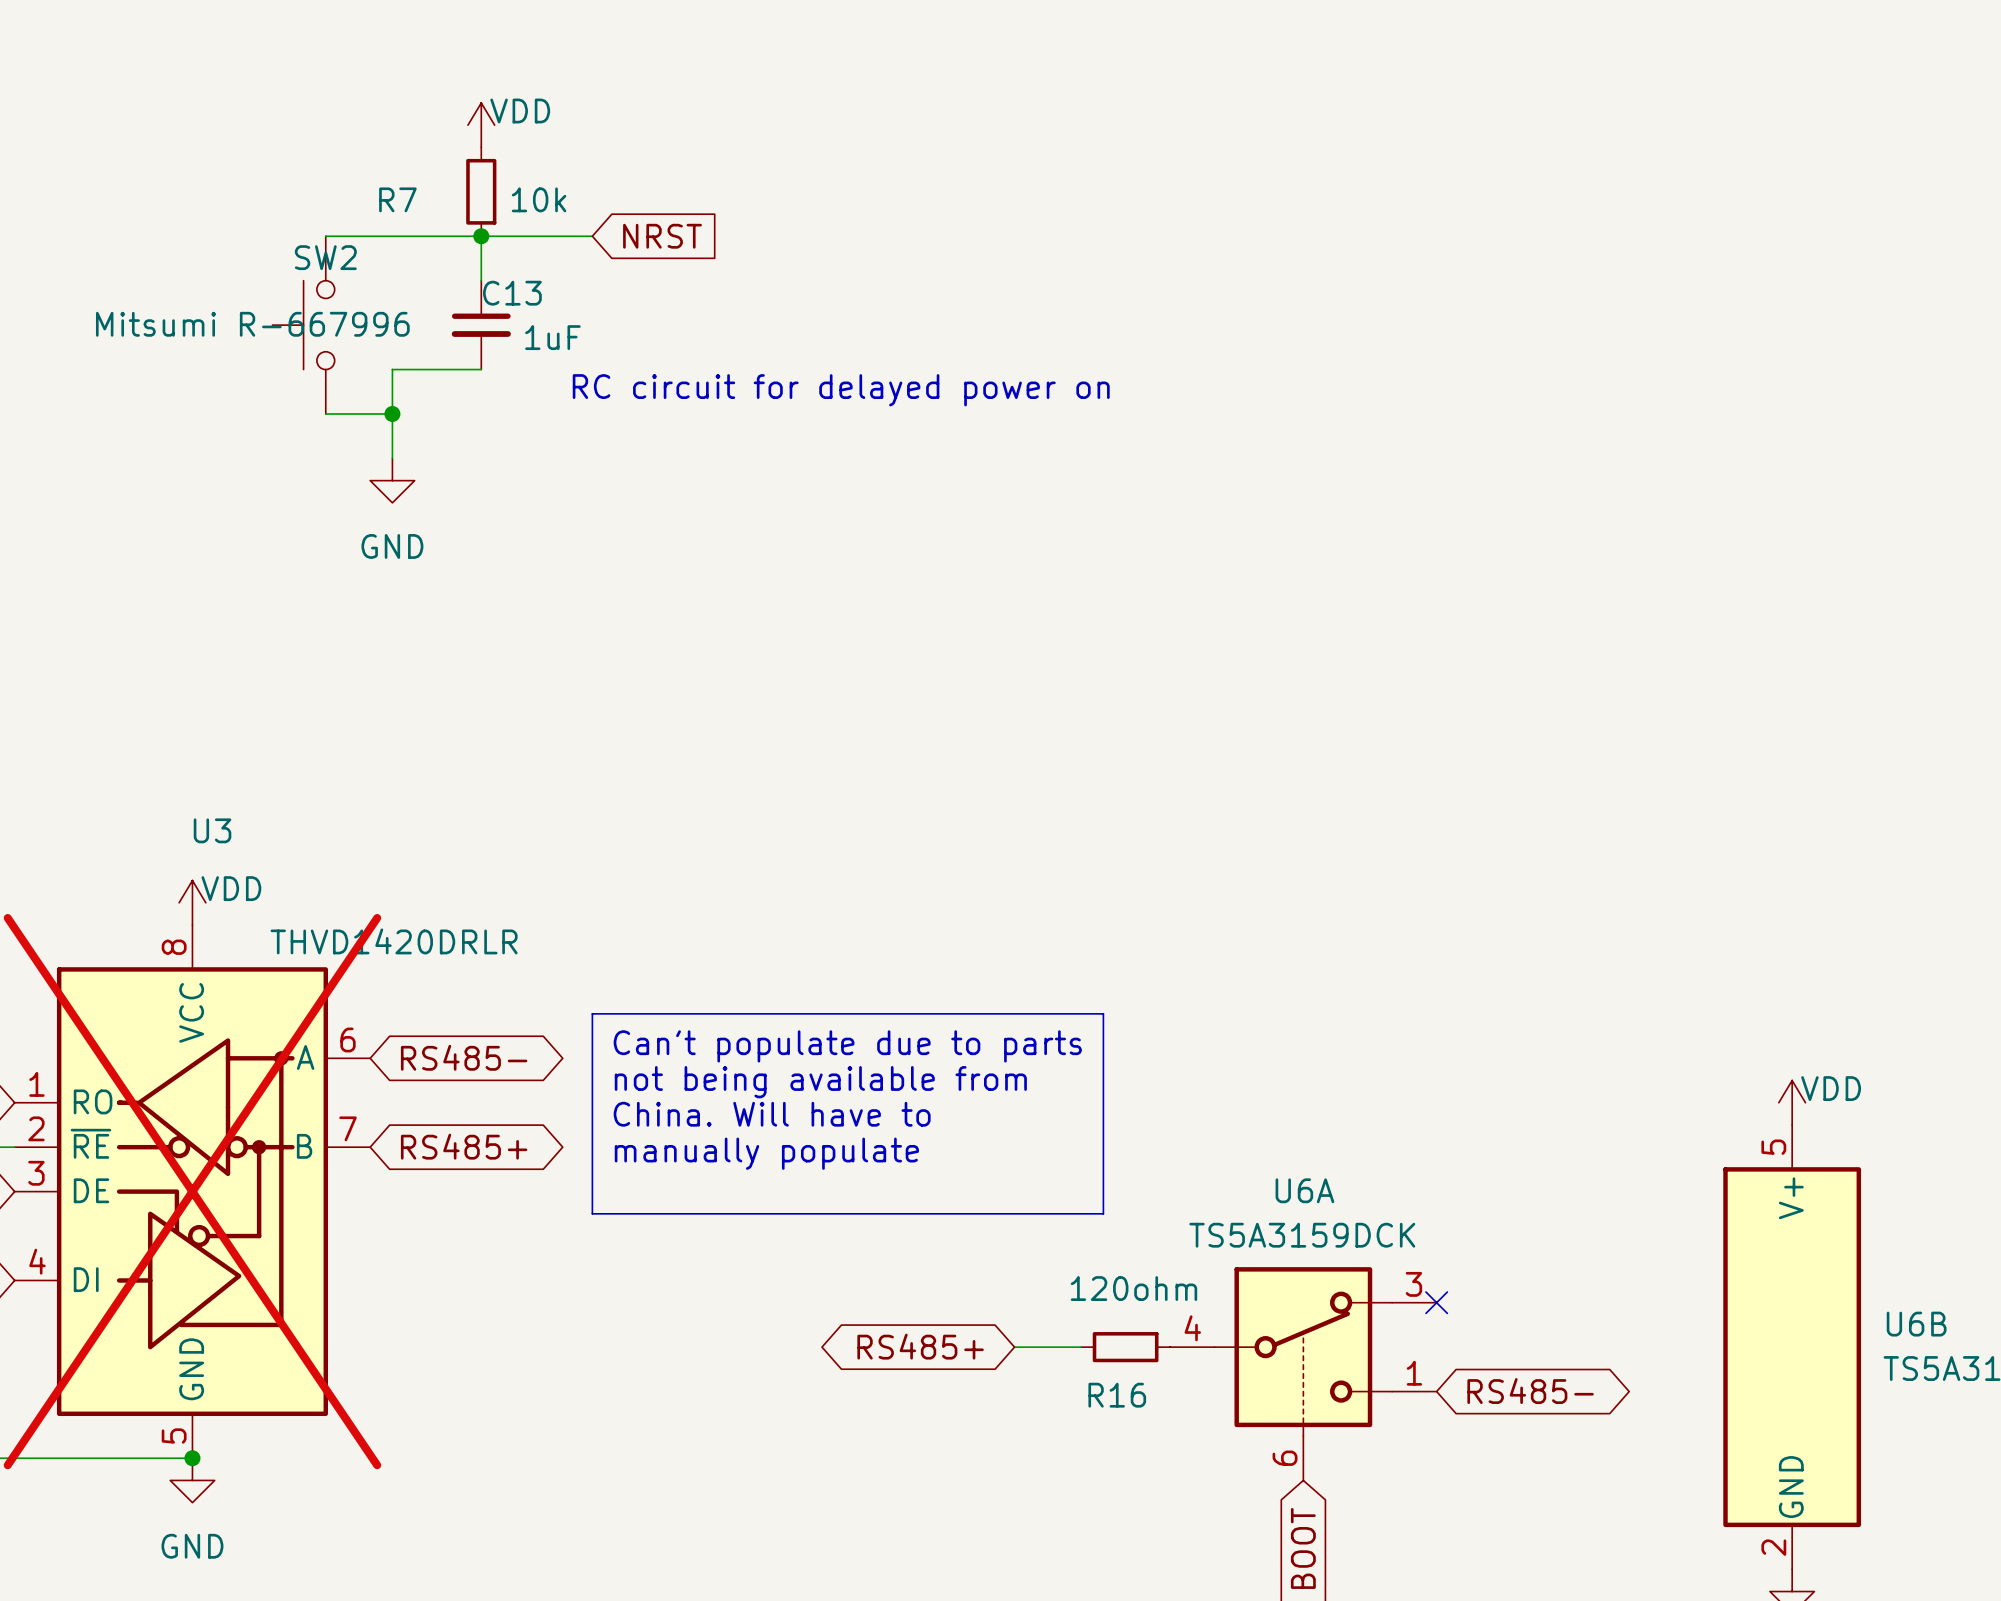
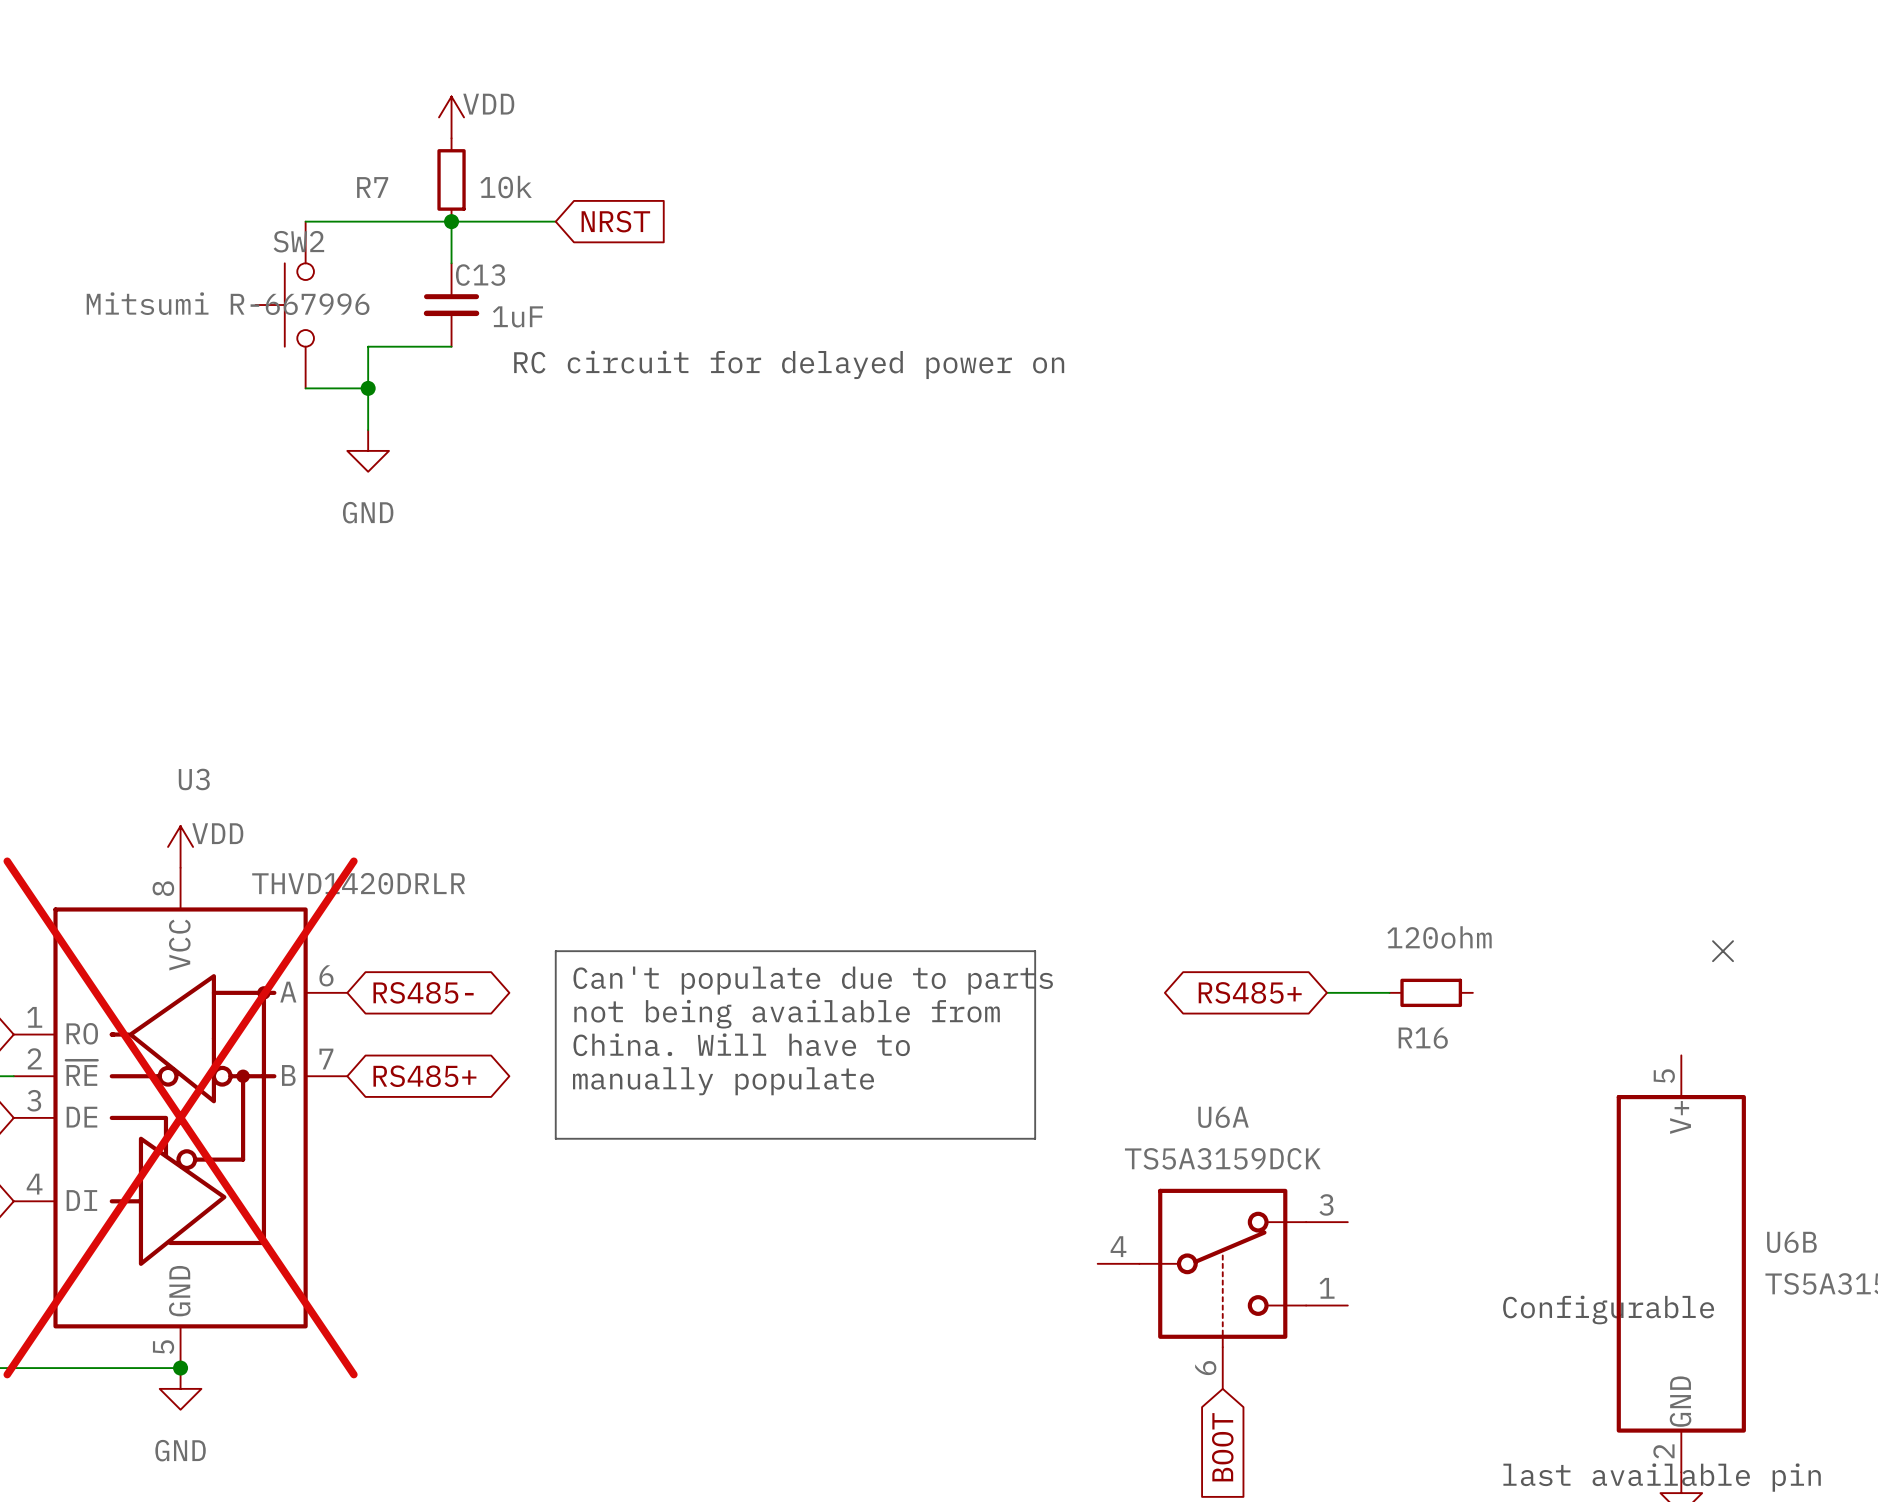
no-connect mark: none -> (1723, 951)
global label: none -> RS485+ (1250, 992)
wire: none -> (1326, 992) (1389, 992)
power symbol: VDD (1792, 1102) -> none
no-connect mark: (1436, 1302) -> none
global label: RS485+ (920, 1346) -> none
wire: (1014, 1347) (1081, 1347) -> none
R16 position: (1125, 1347) -> (1431, 992)
global label: RS485- (1530, 1391) -> none
text: none -> Configurable (1608, 1309)
text: none -> last available pin (1662, 1477)

